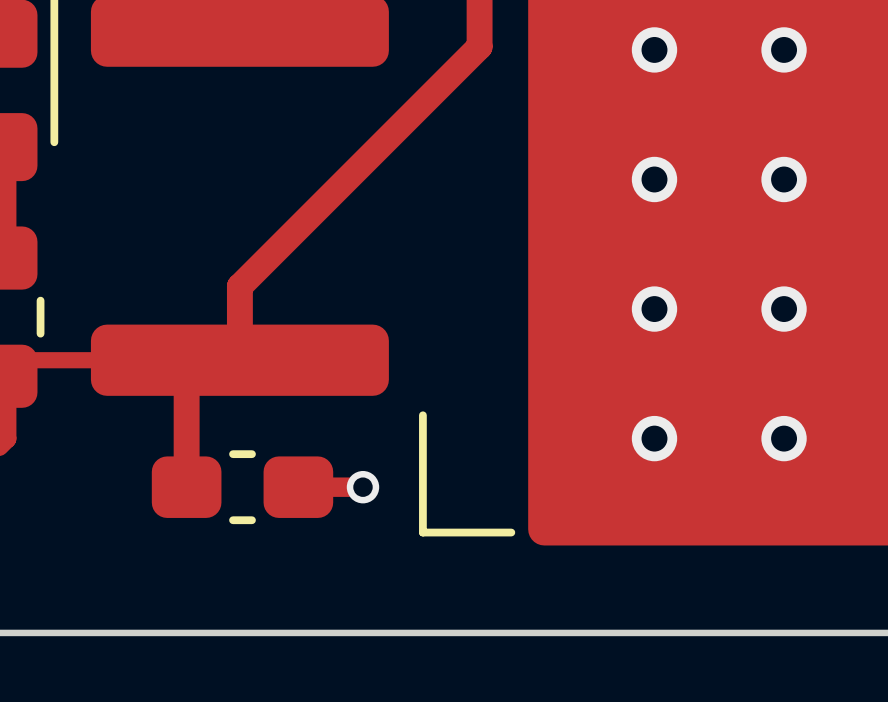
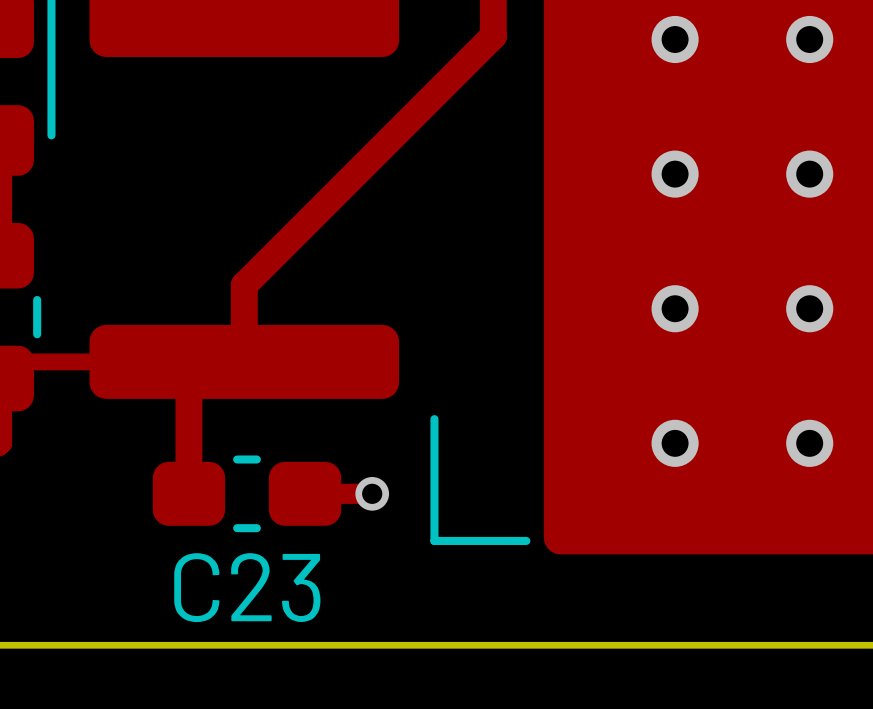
C23 name: none -> C23 (247, 587)

